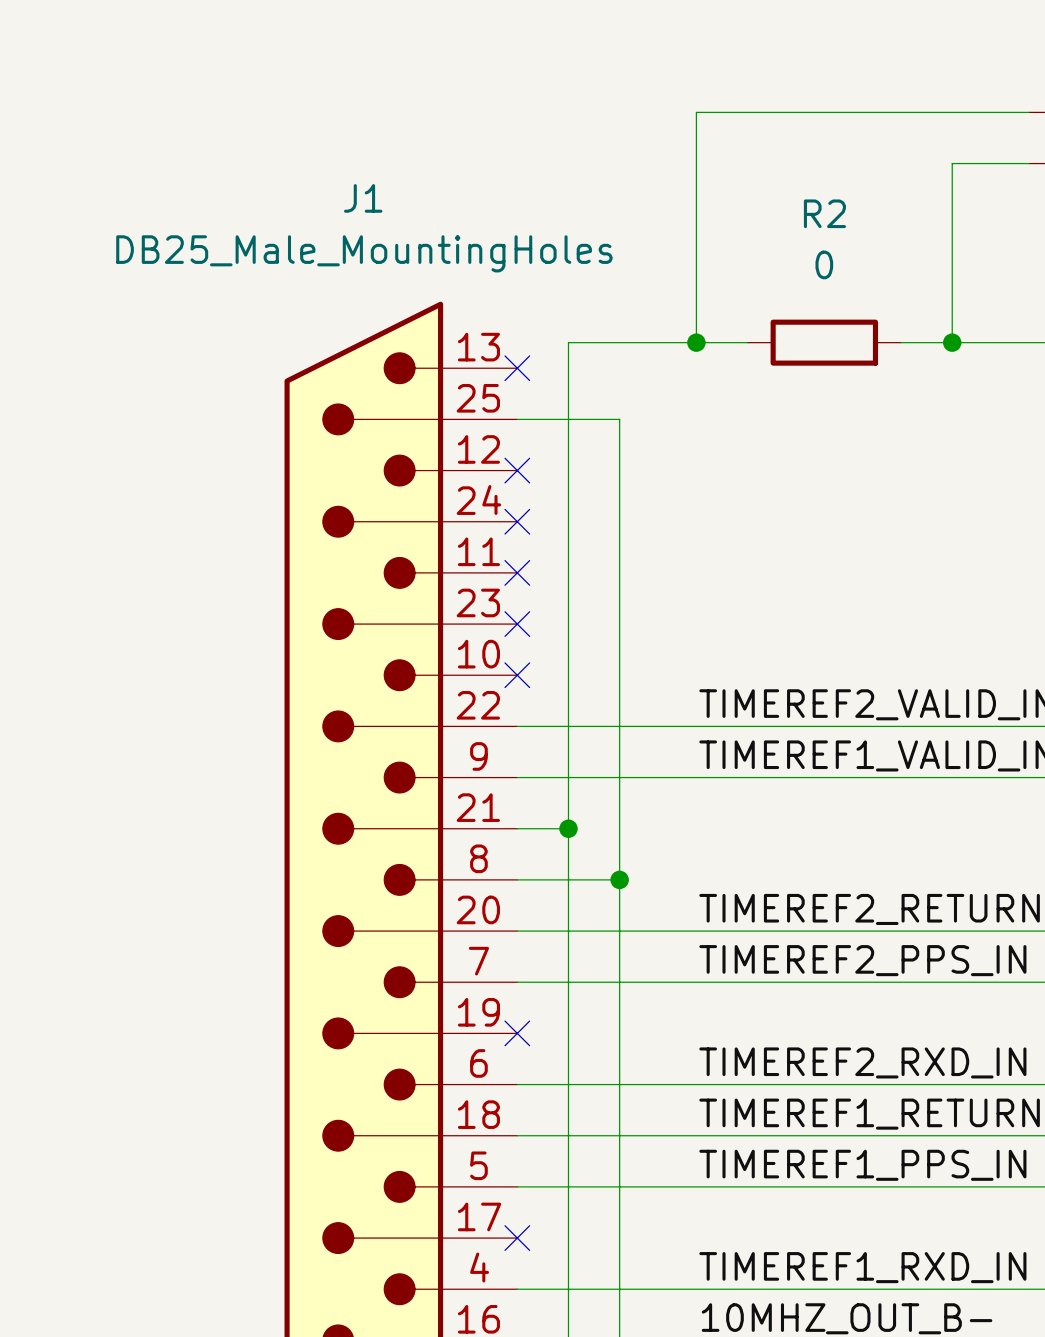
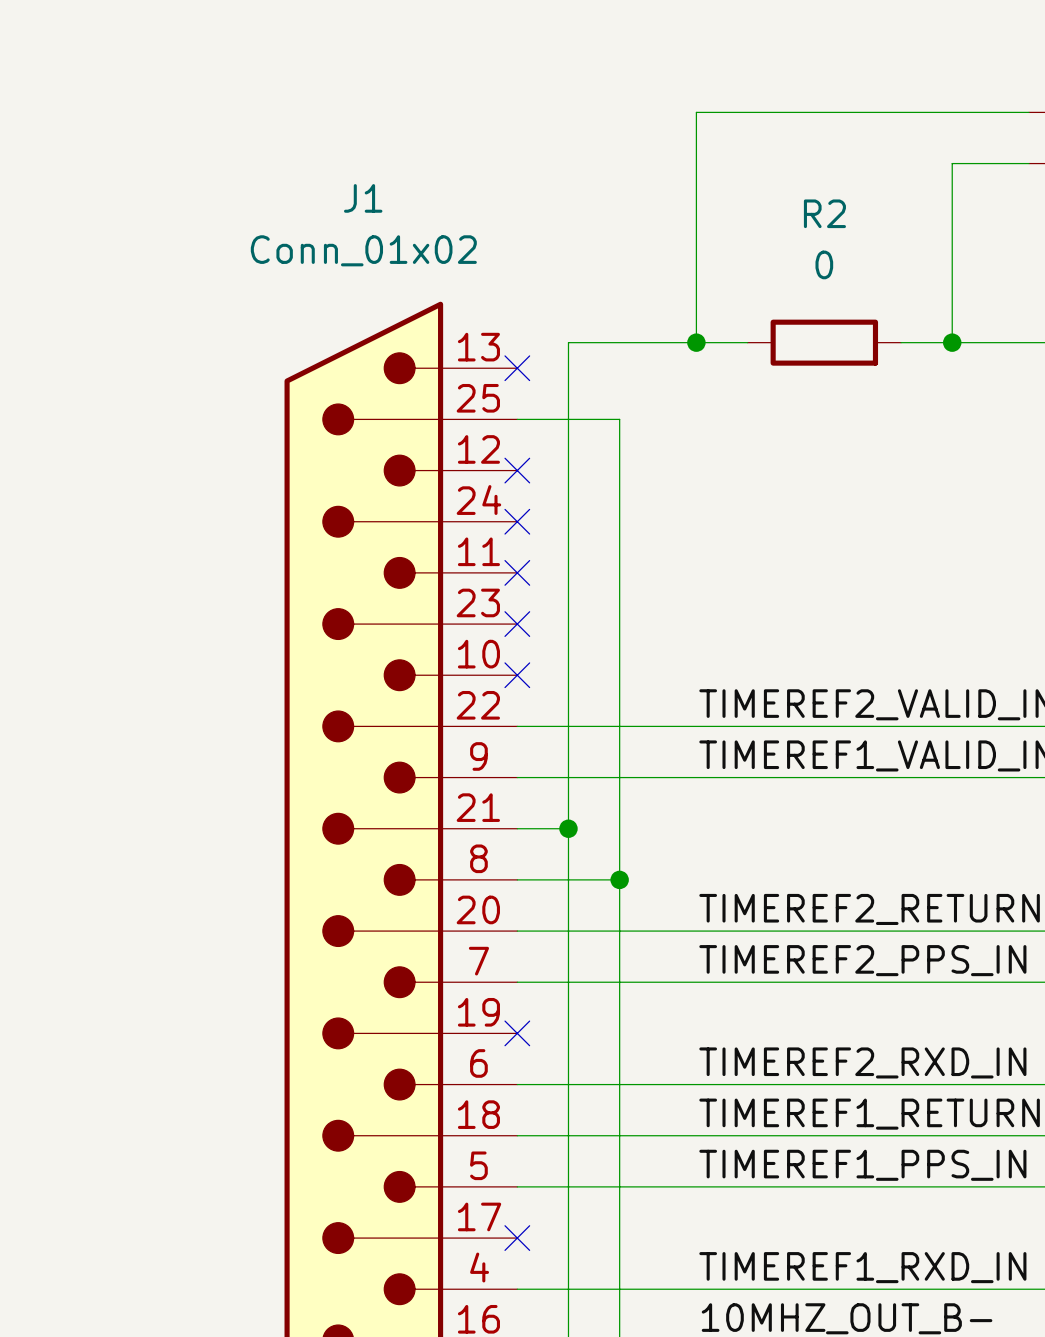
J1 value: DB25_Male_MountingHoles (364, 253) -> Conn_01x02 (363, 250)

